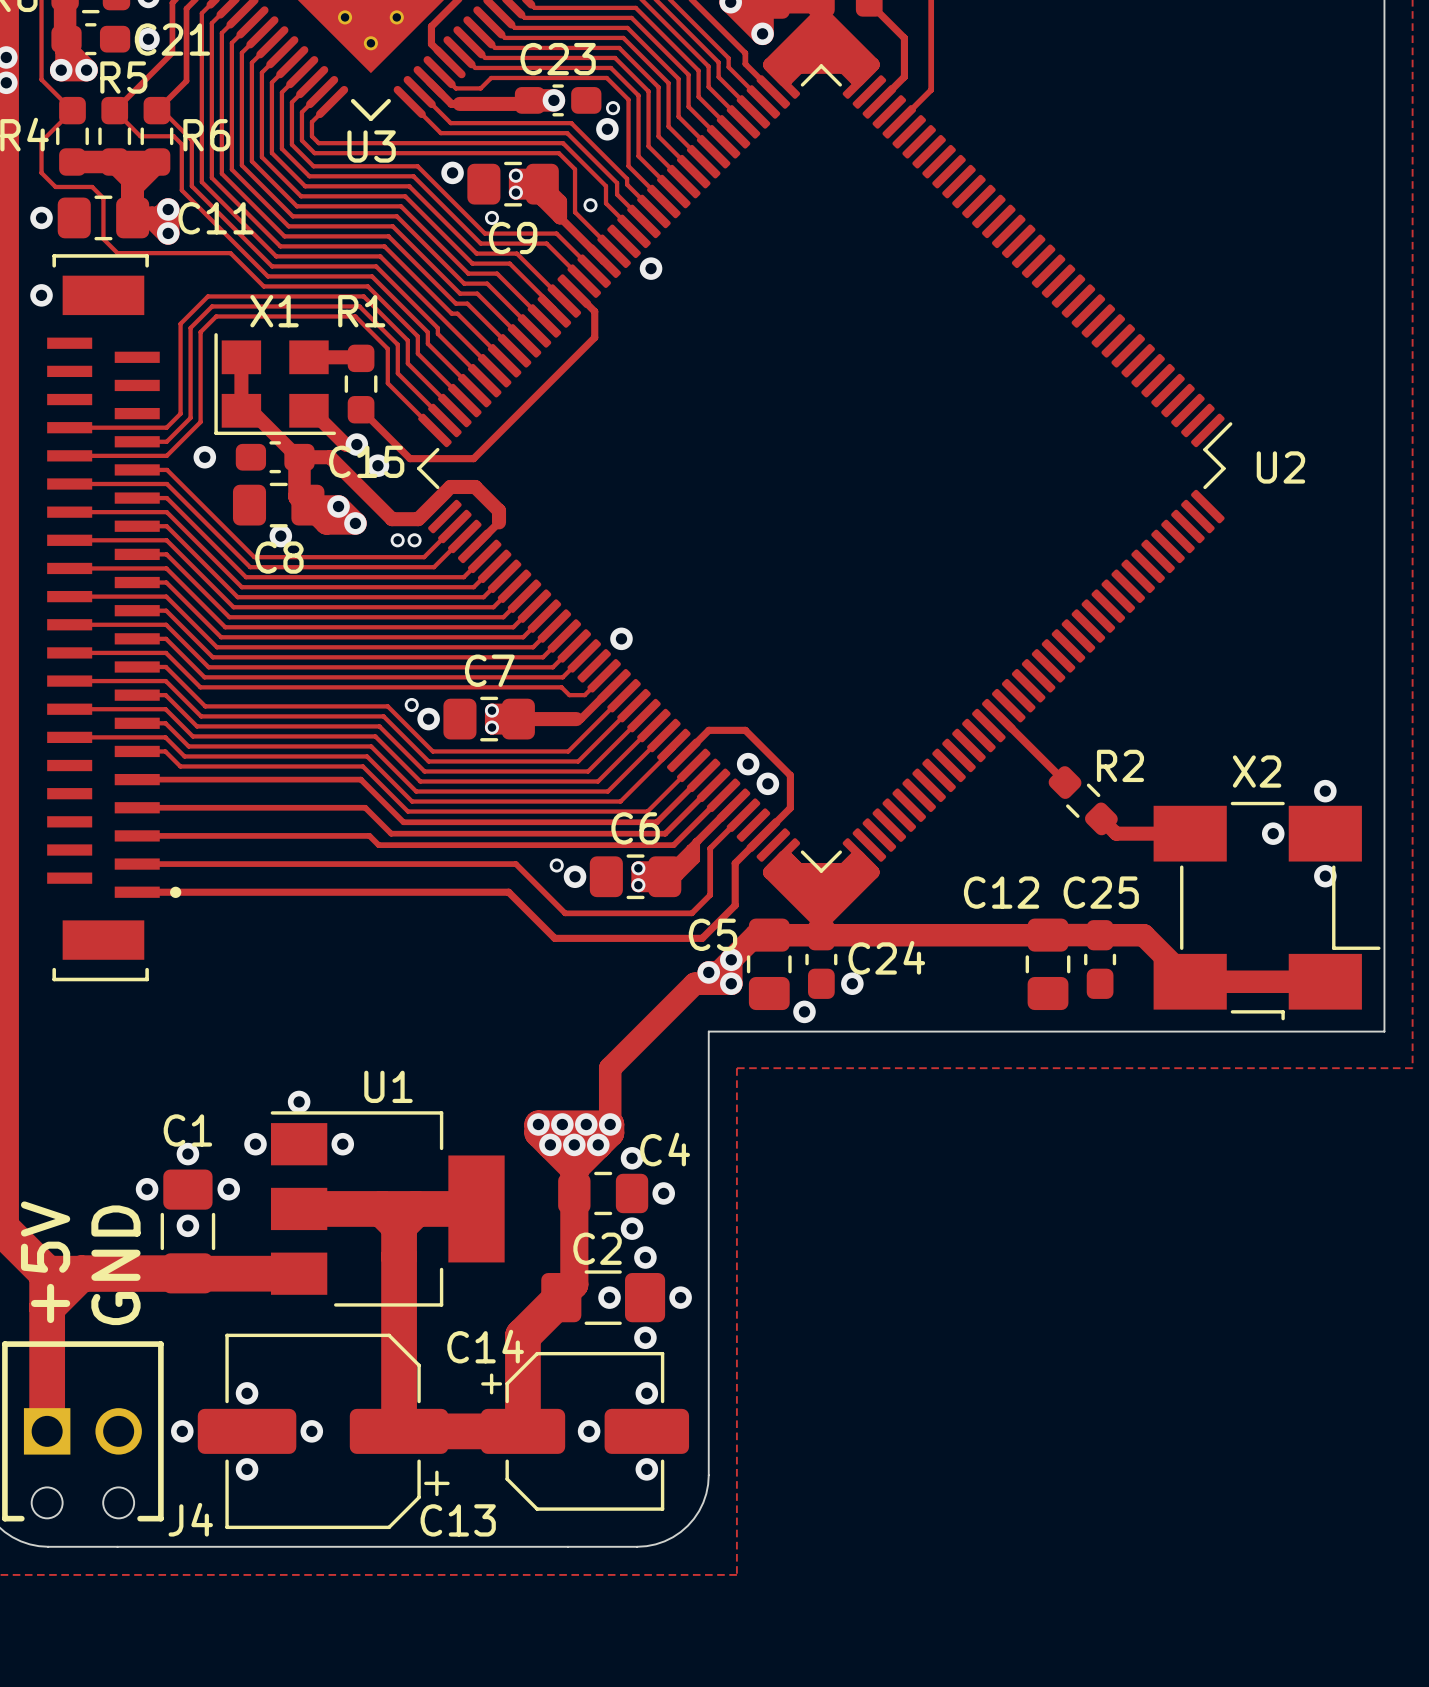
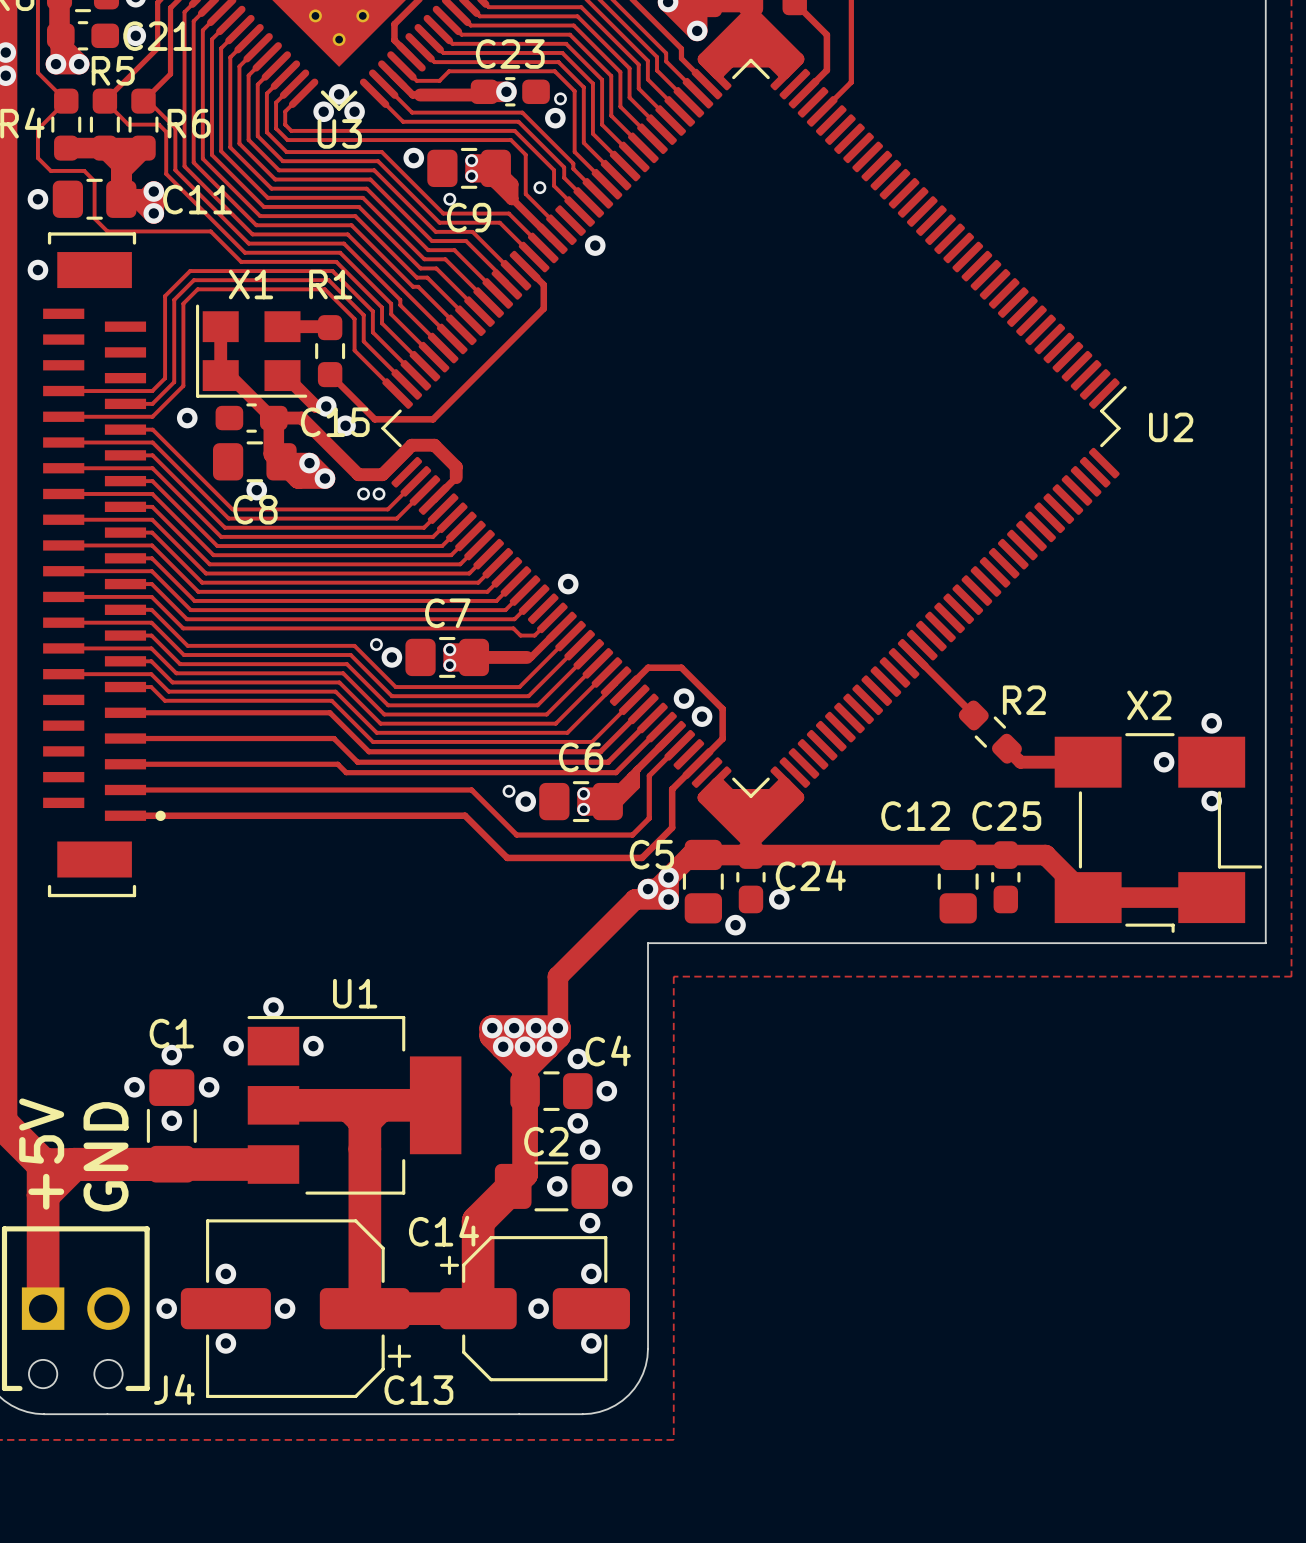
via: none -> (339, 94)
via: none -> (323, 111)
via: none -> (354, 111)

